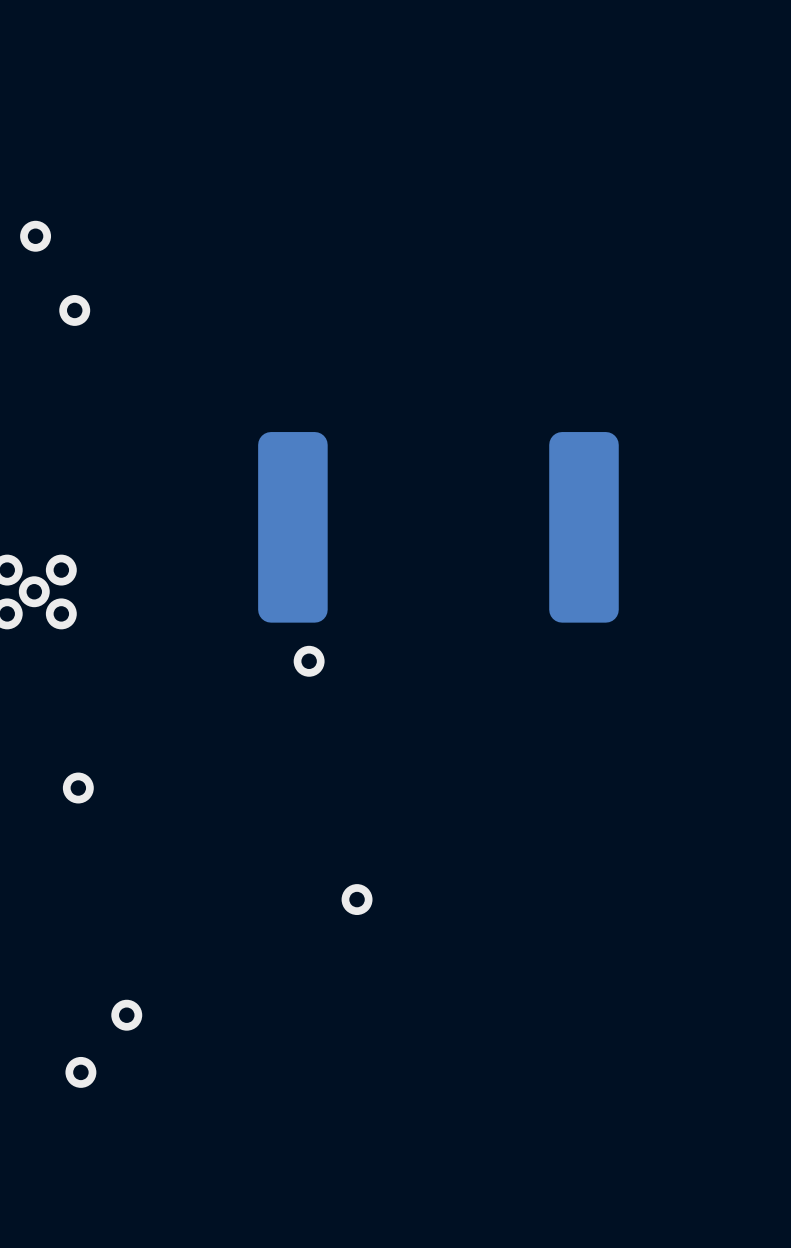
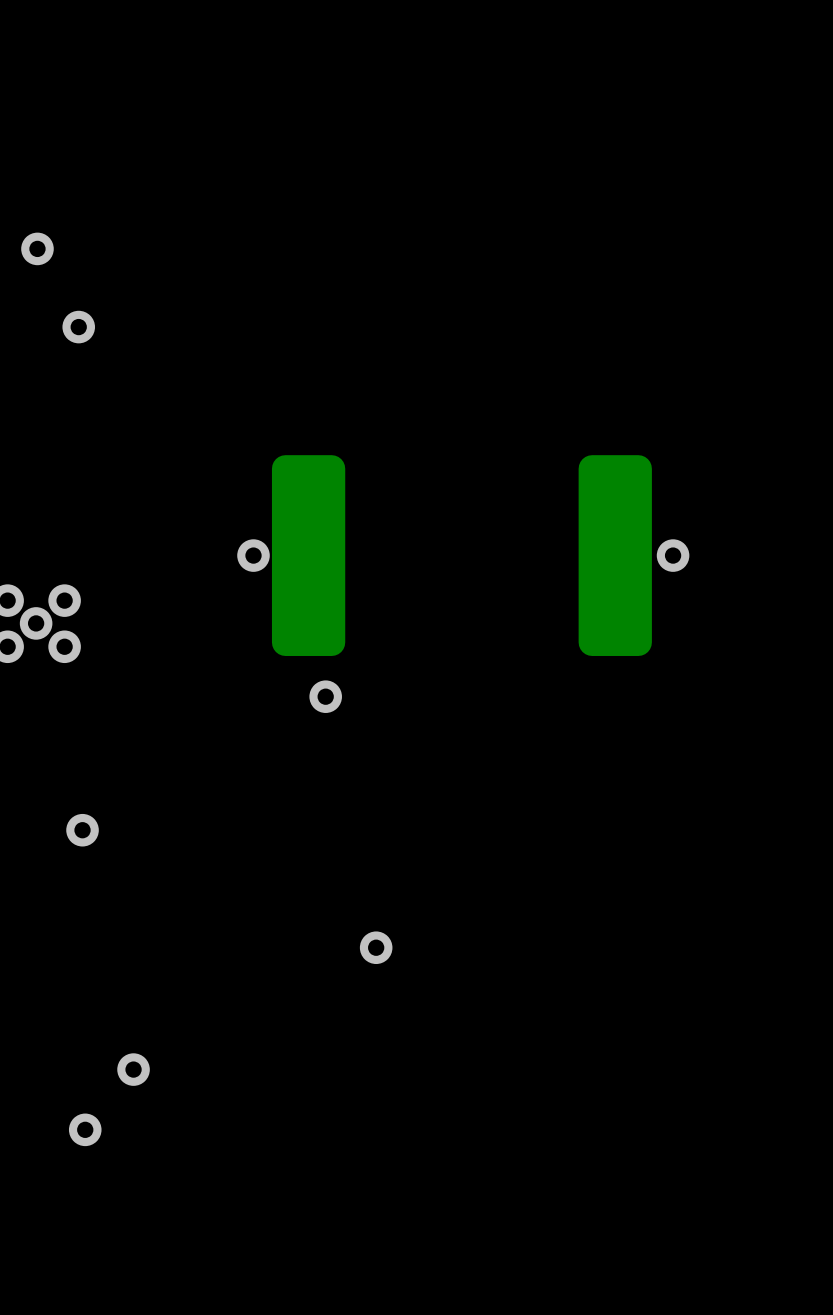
via: none -> (253, 555)
via: none -> (673, 555)

